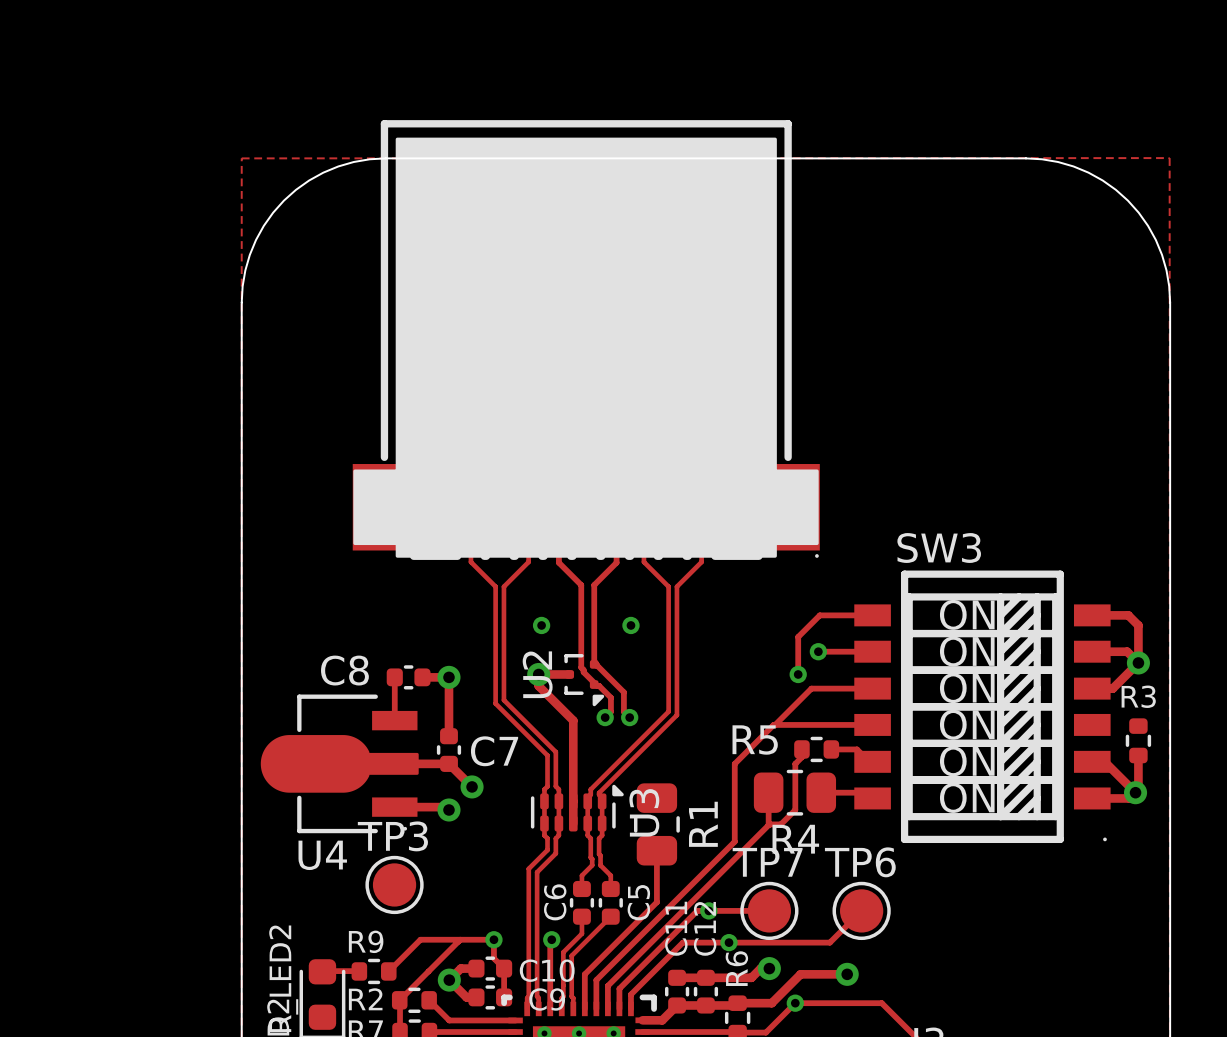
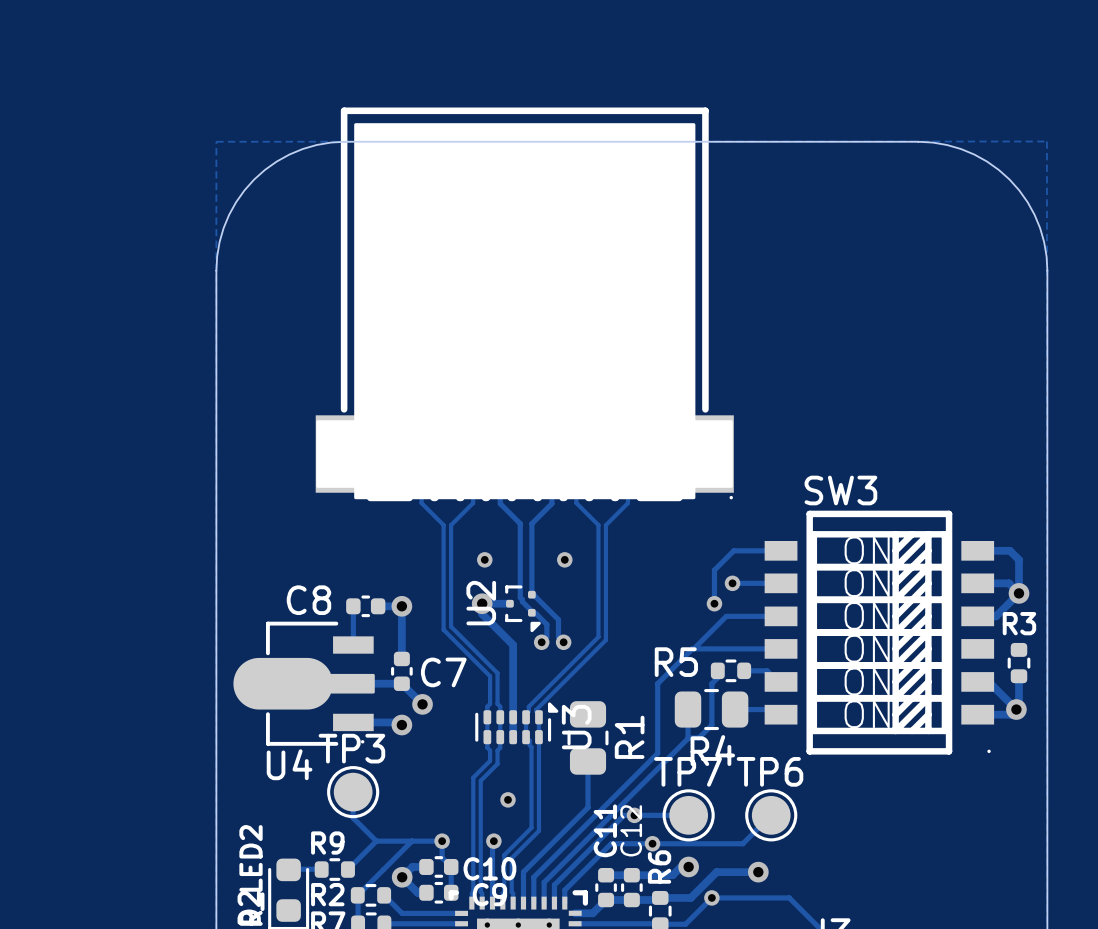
track: (587, 823) (592, 865) (581, 875) (581, 889) -> (526, 737) (531, 747) (531, 827) (504, 855)
track: (602, 835) (599, 838) (600, 865) (610, 875) (610, 889) -> (538, 747) (538, 830) (511, 858)
track: none -> (353, 792) (353, 817) (376, 841)
via: none -> (508, 799)
C6: (581, 902) -> none
C5: (610, 902) -> none
track: (581, 916) (581, 933) (563, 952) (563, 955) -> none
track: (610, 916) (571, 955) (571, 958) -> none

